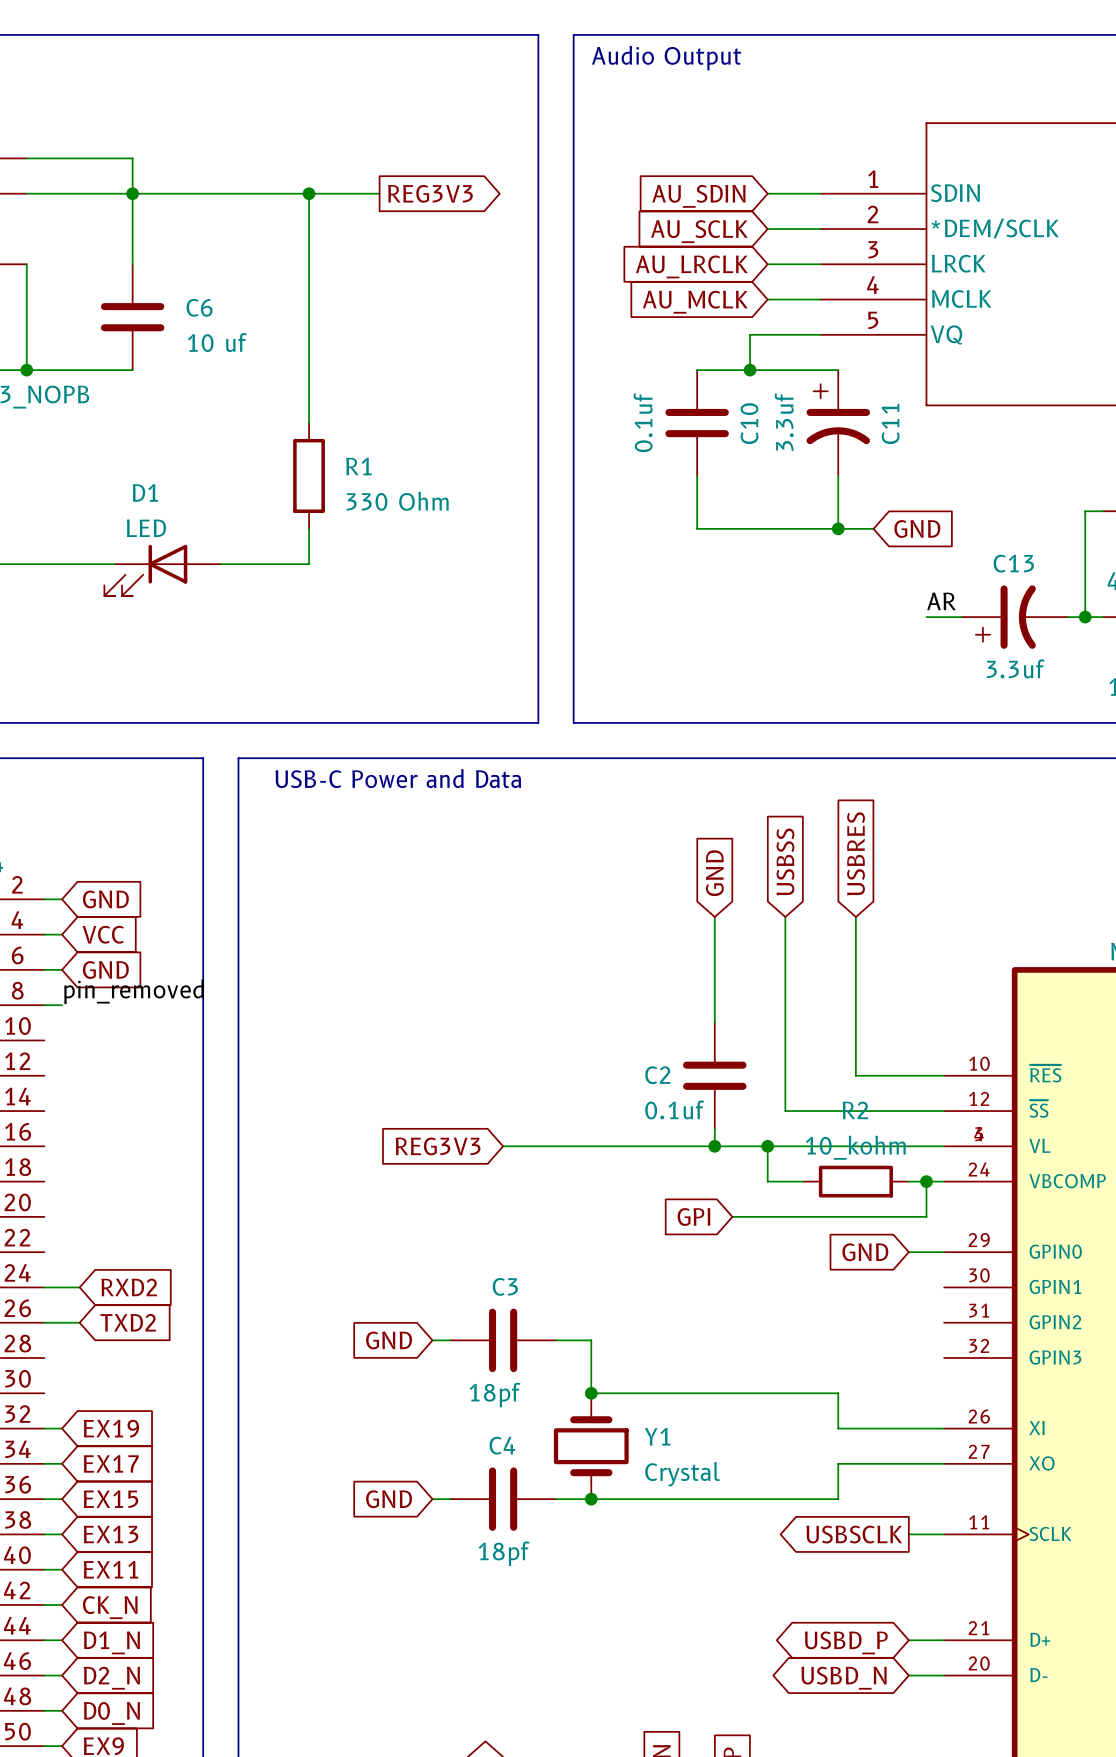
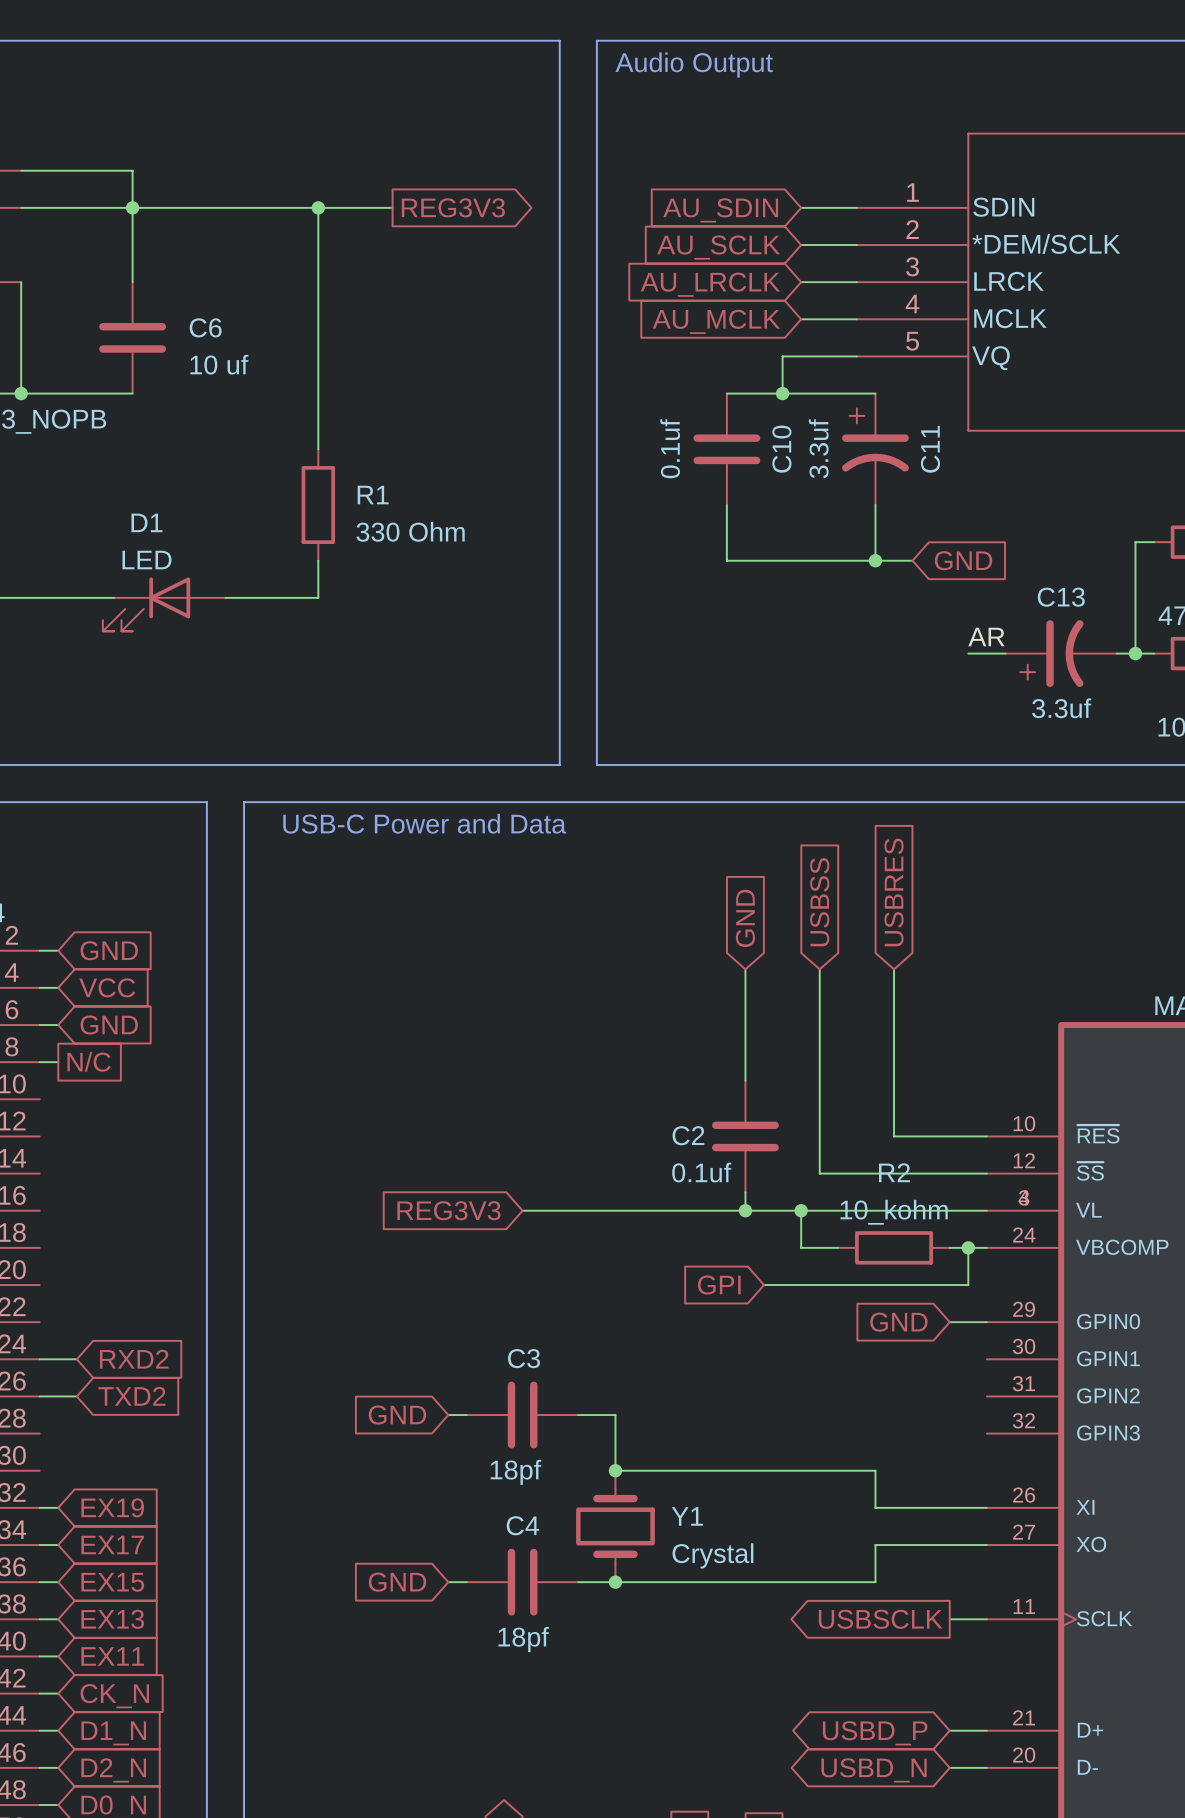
label: pin_removed (134, 991) -> none
global label: none -> N/C (89, 1061)

